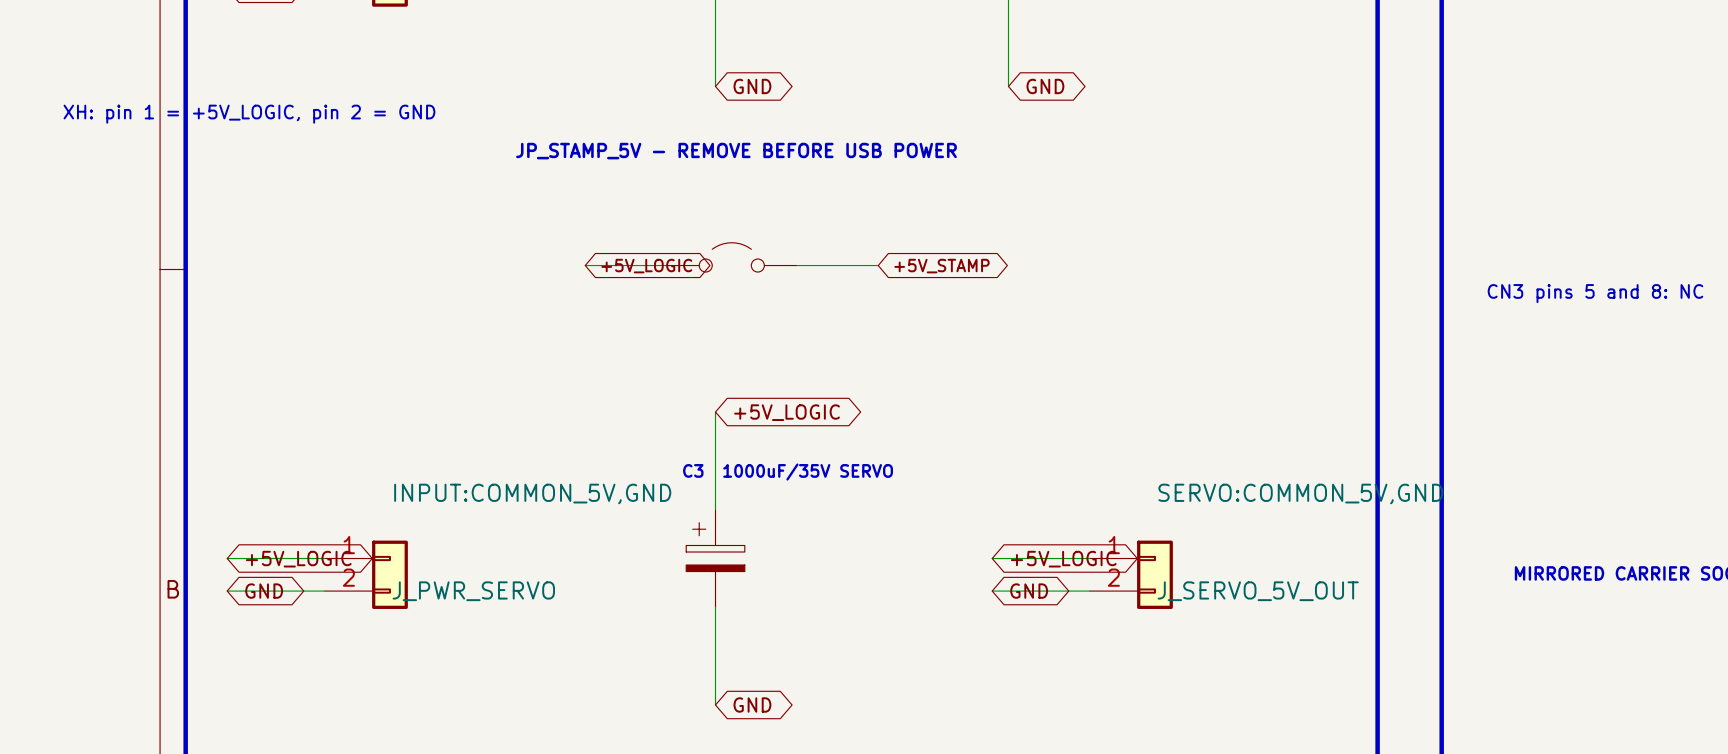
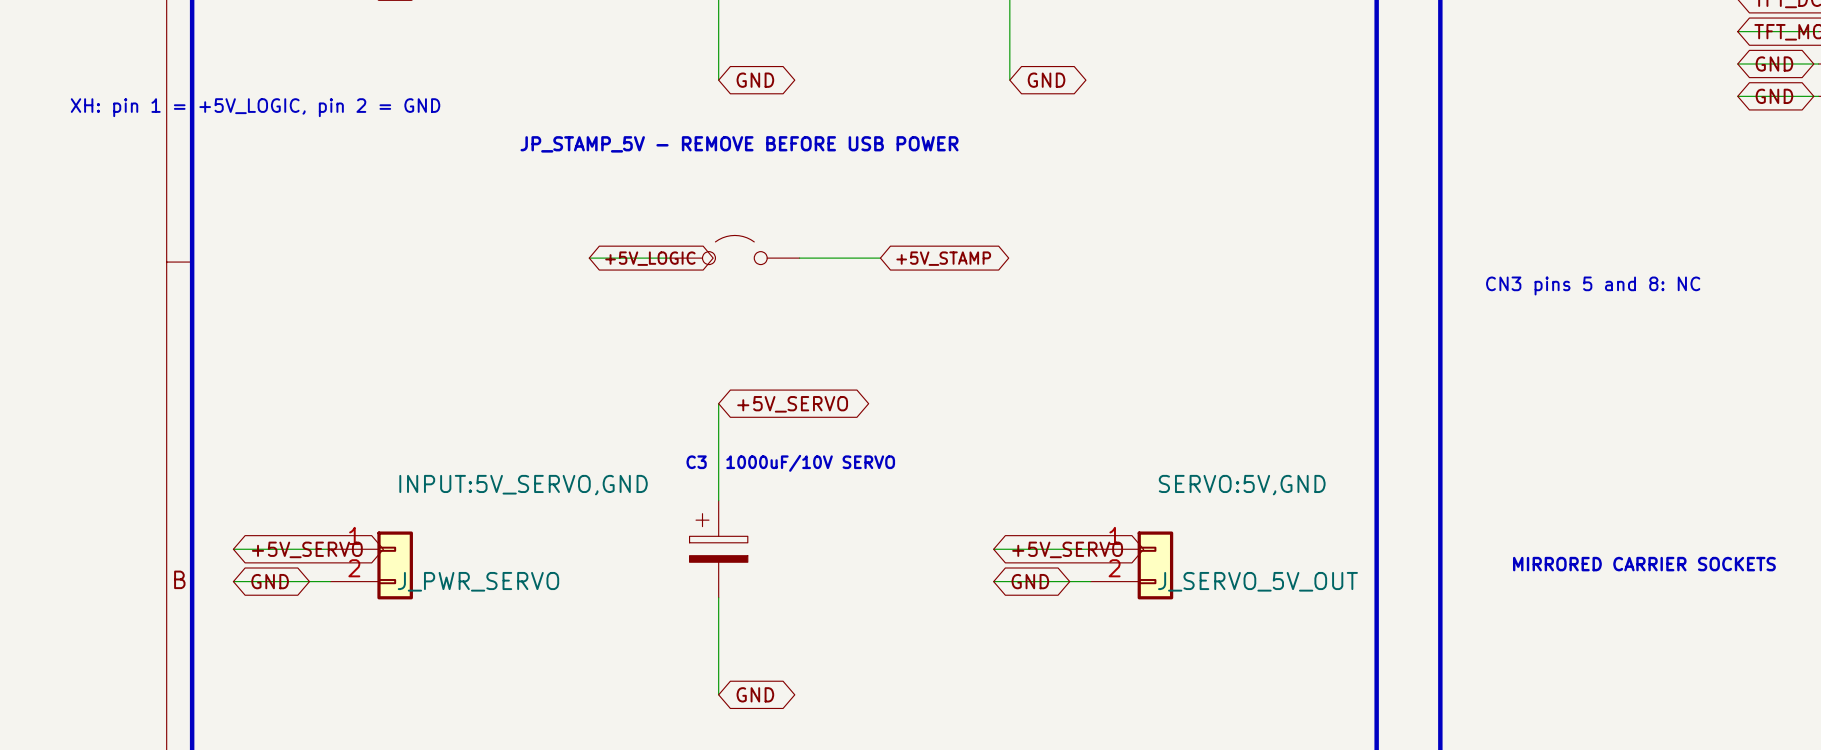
global label: +5V_LOGIC (787, 412) -> +5V_SERVO (792, 404)
text: C3 1000uF/35V SERVO (788, 472) -> C3 1000uF/10V SERVO (790, 463)
J_PWR_SERVO value: INPUT:COMMON_5V,GND (532, 493) -> INPUT:5V_SERVO,GND (523, 485)
J_SERVO_5V_OUT value: SERVO:COMMON_5V,GND (1300, 493) -> SERVO:5V,GND (1242, 485)
global label: +5V_LOGIC (298, 559) -> +5V_SERVO (307, 549)
global label: +5V_LOGIC (1063, 559) -> +5V_SERVO (1067, 549)

